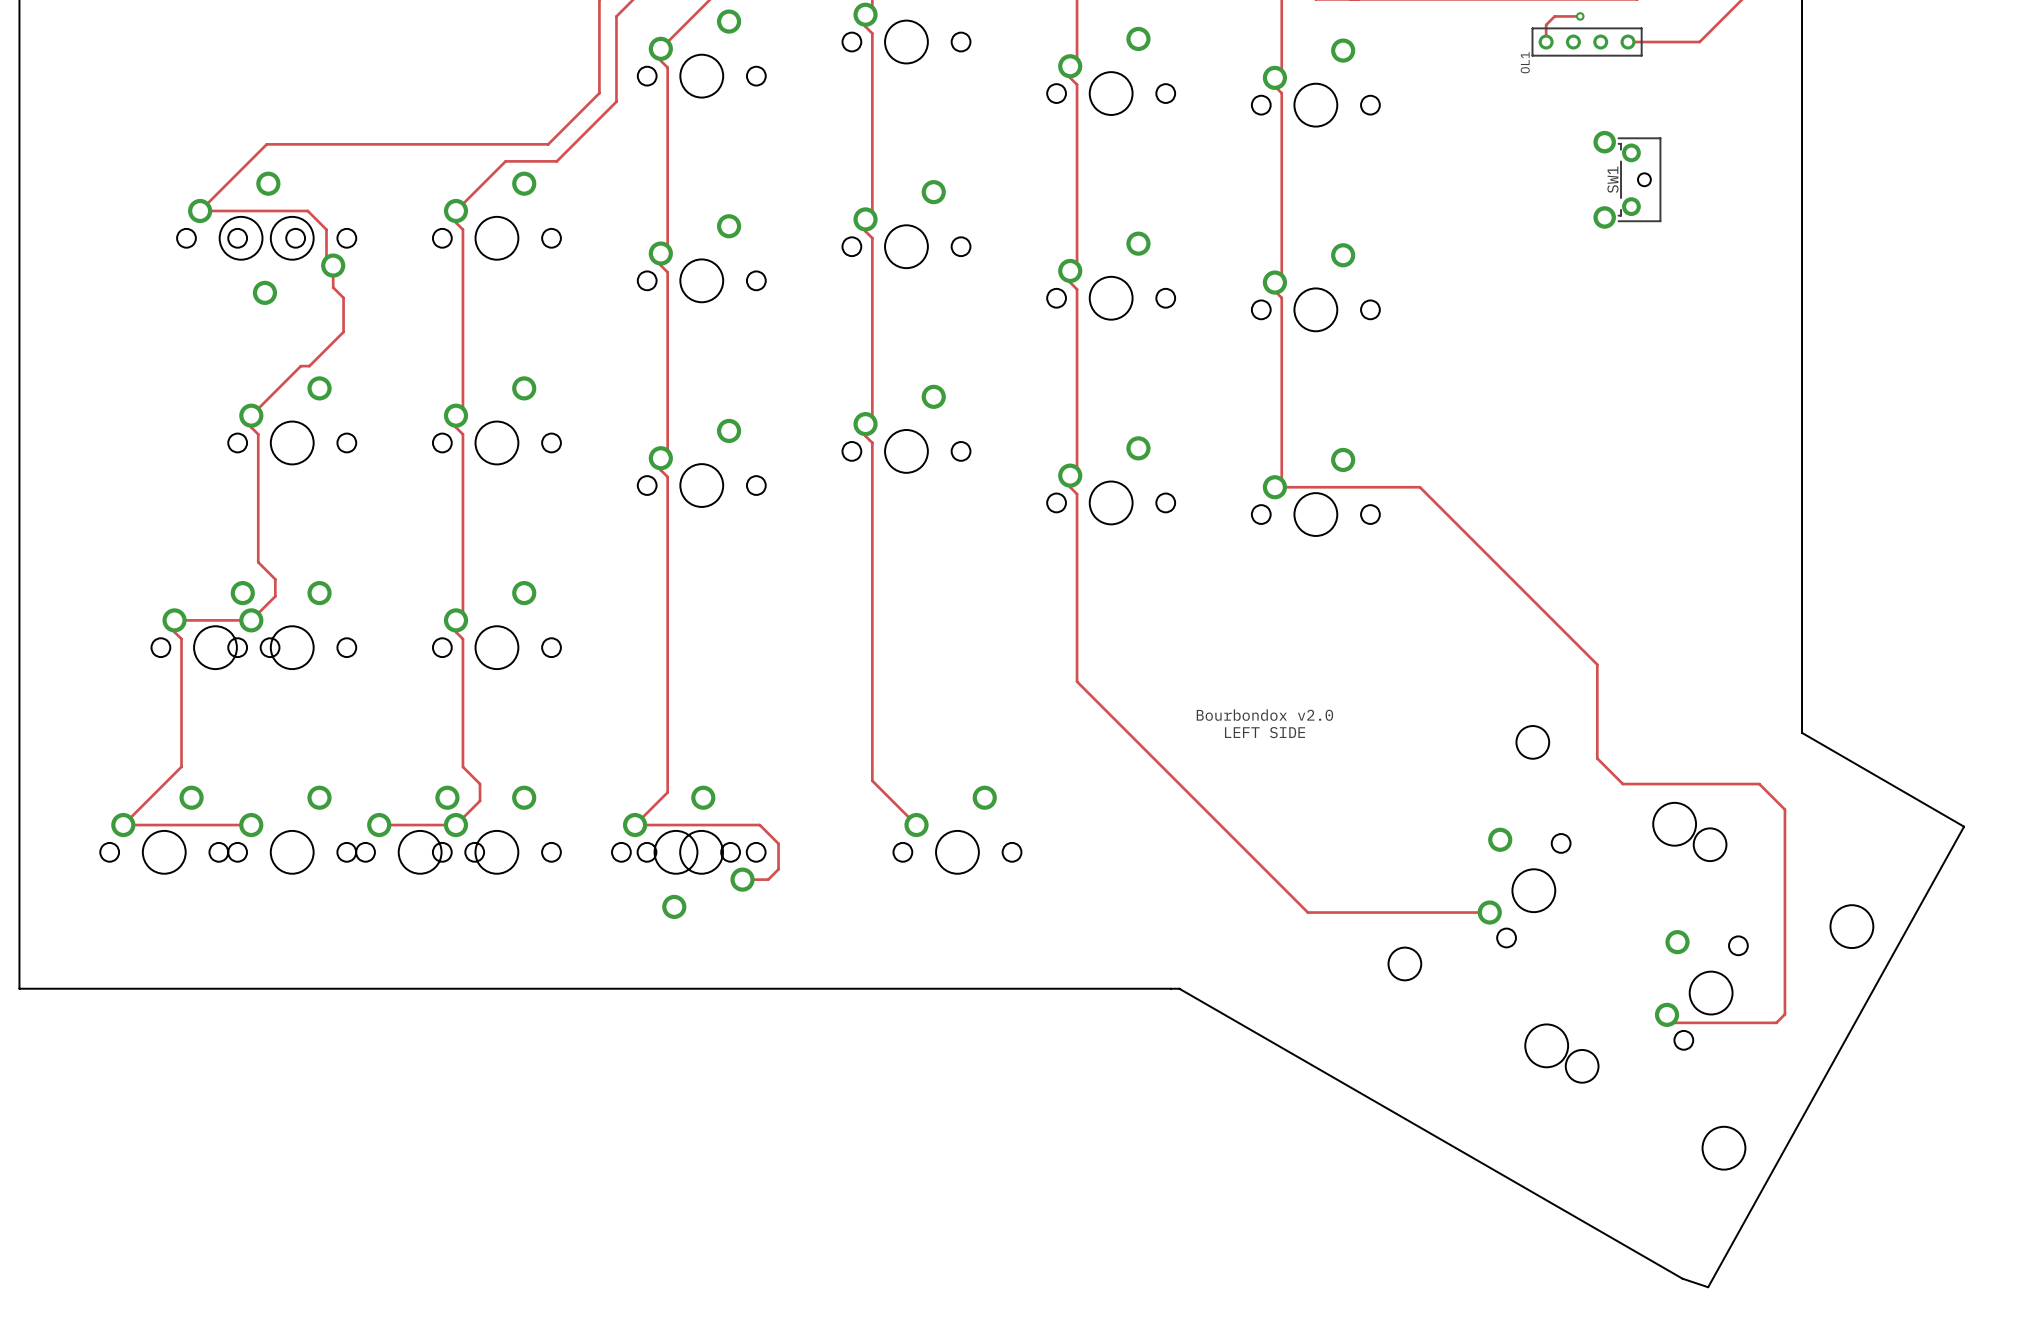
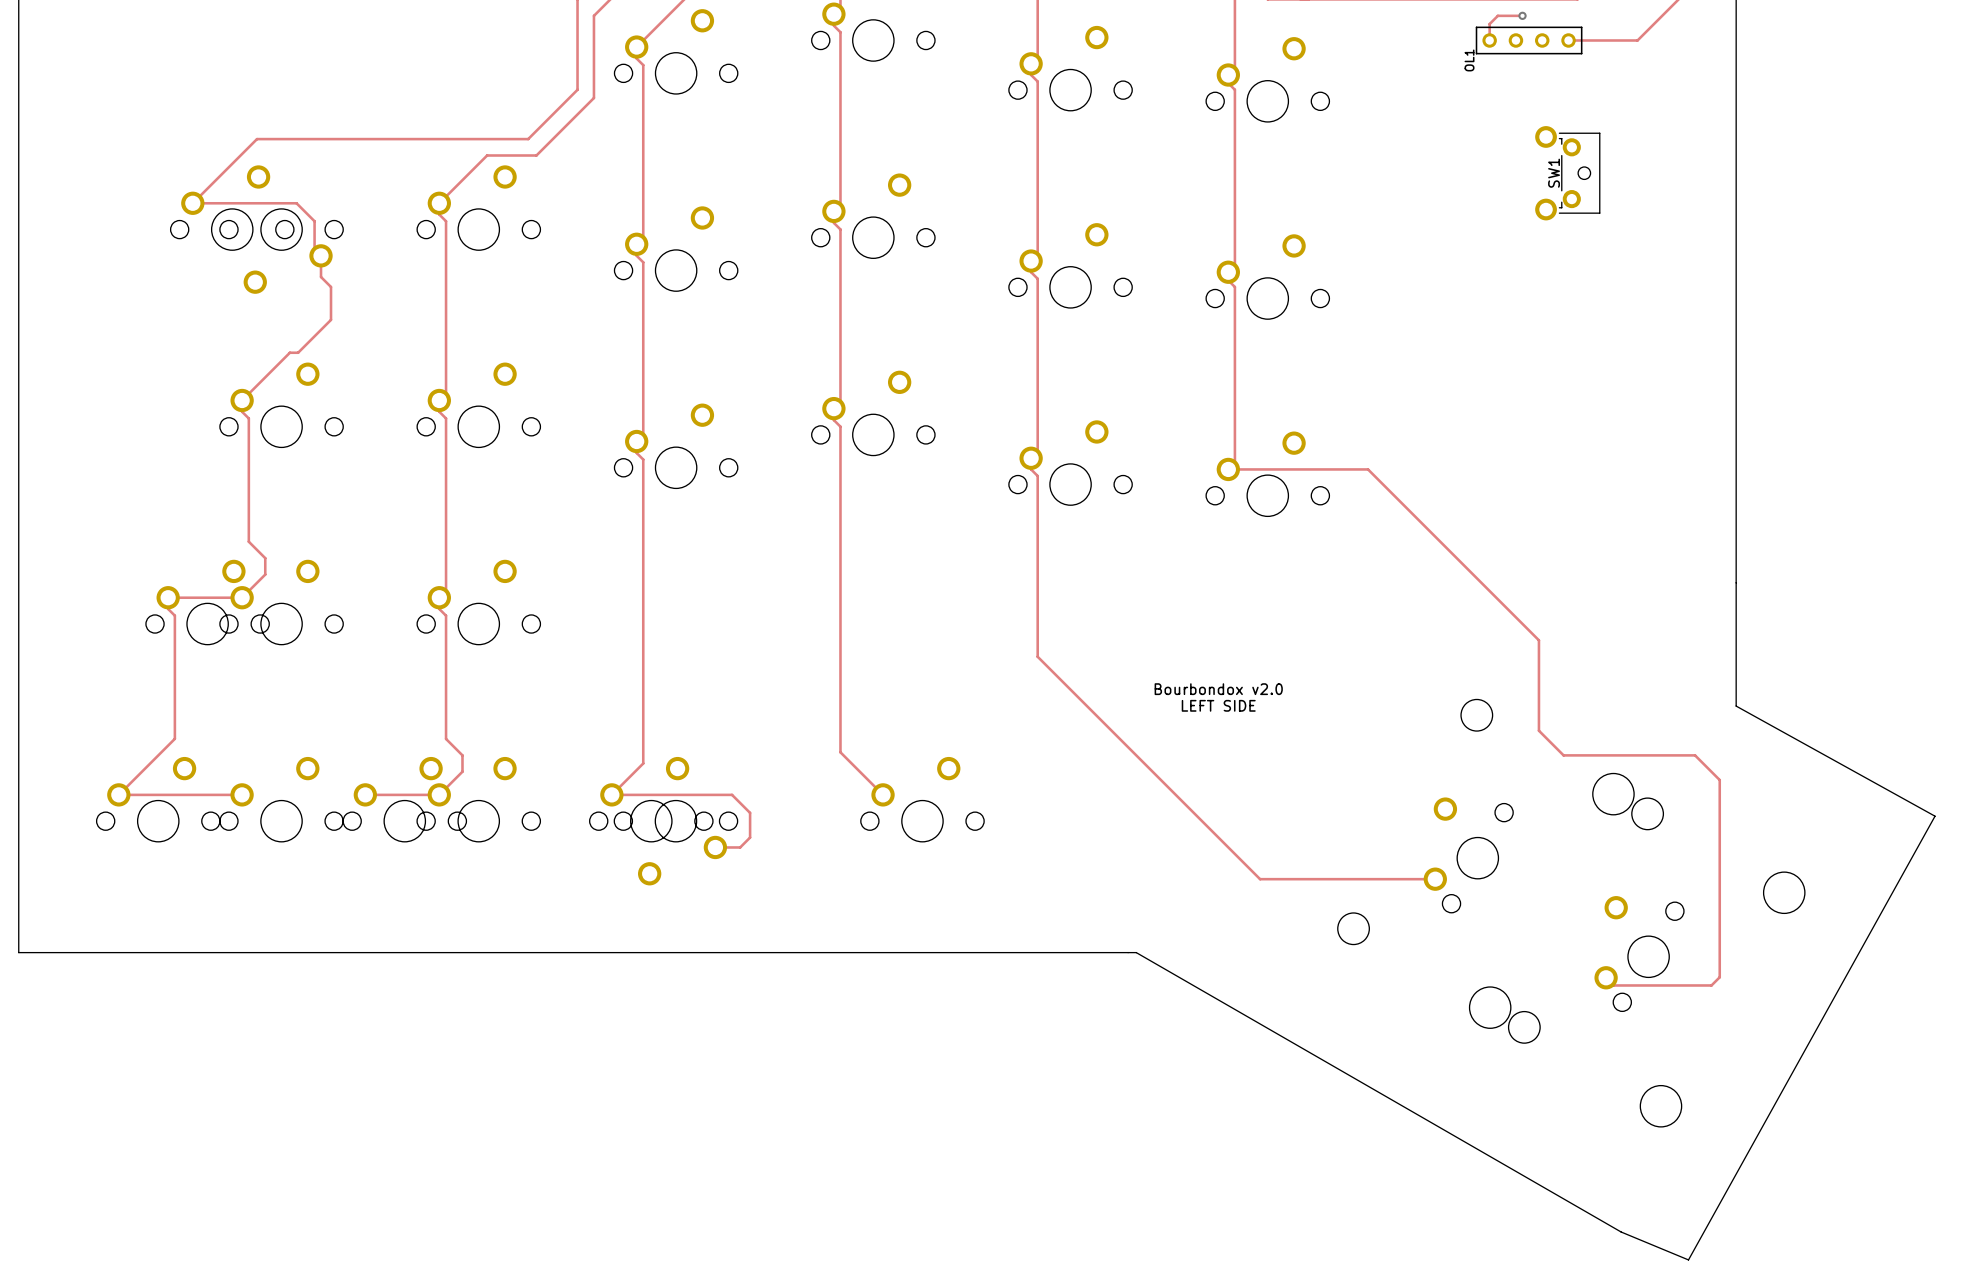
board edge: (1802, 732) (1964, 826) (1708, 1287) (1682, 1278) -> (1736, 706) (1935, 816) (1688, 1259) (1621, 1232)

